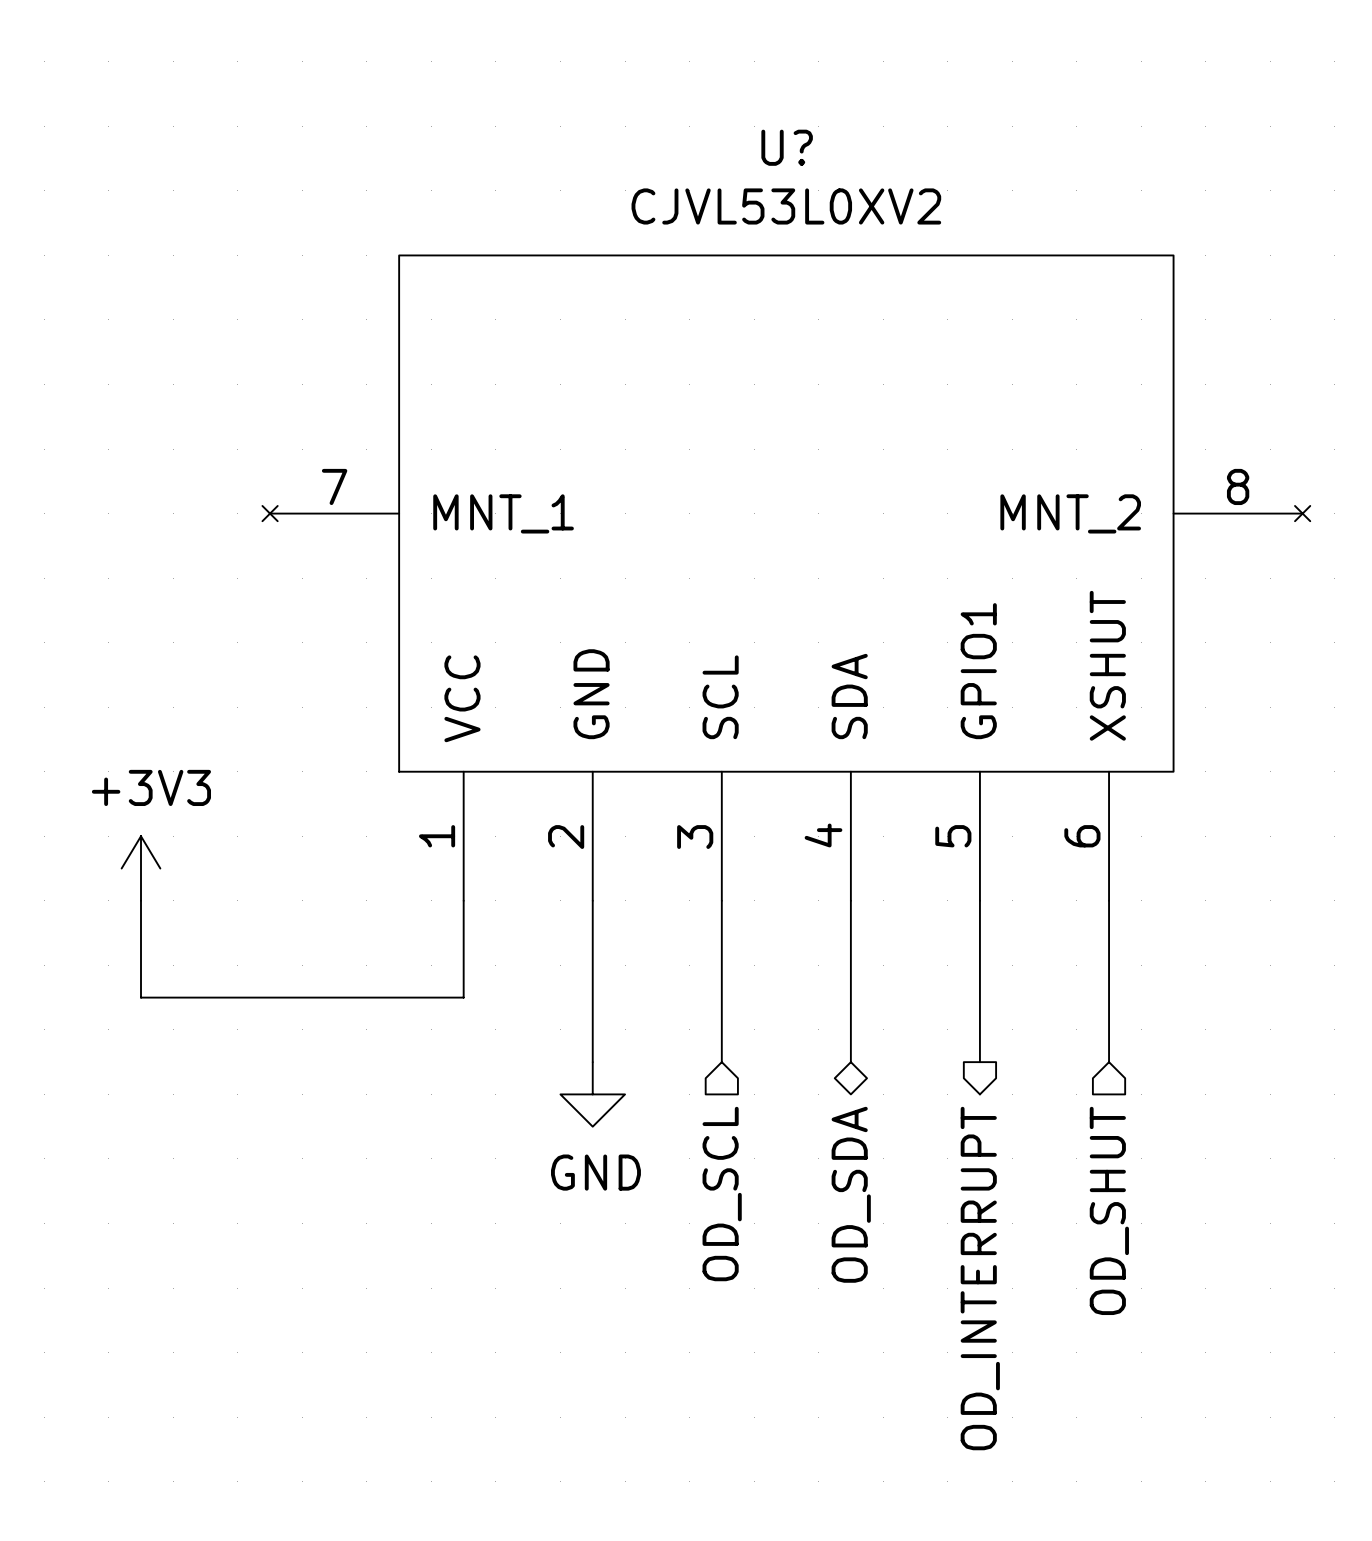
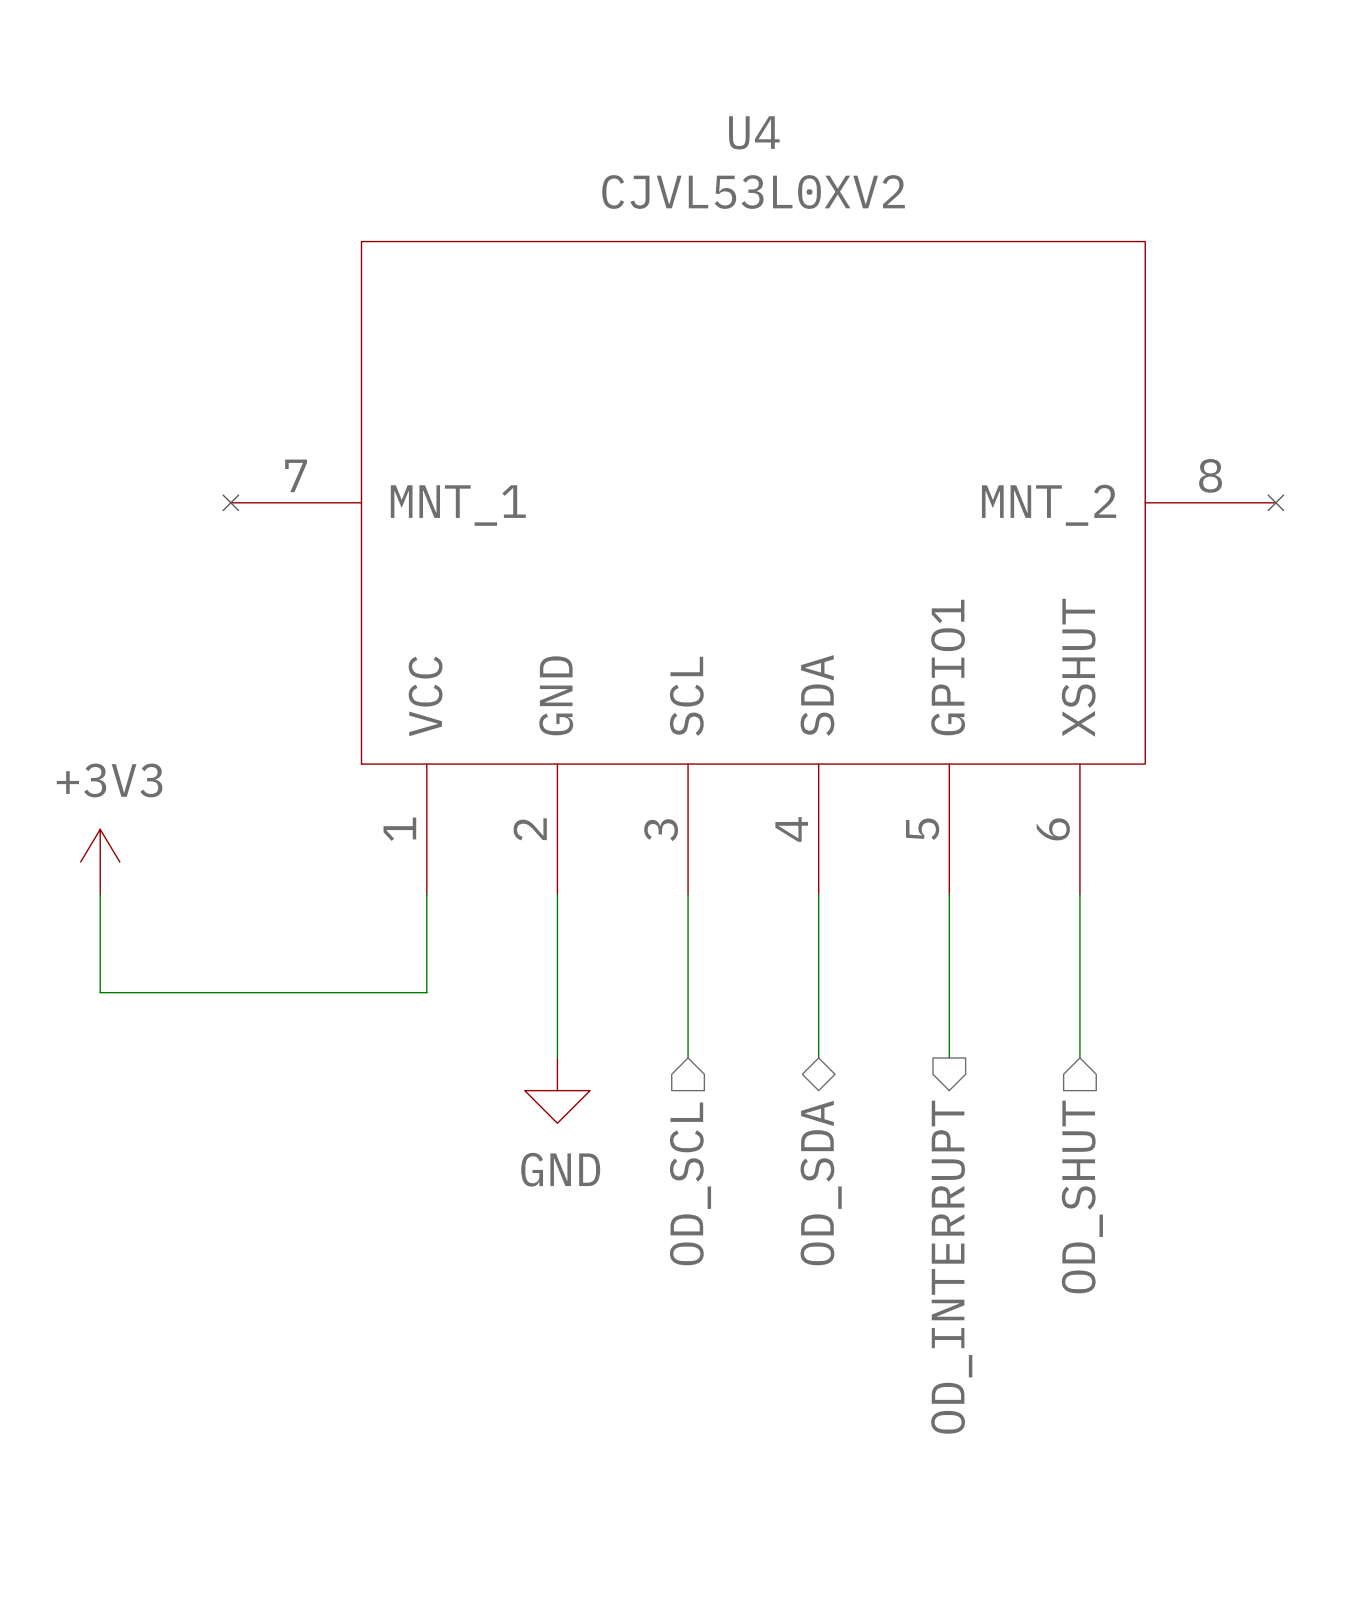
U? name: U? (787, 147) -> U4 (754, 132)

